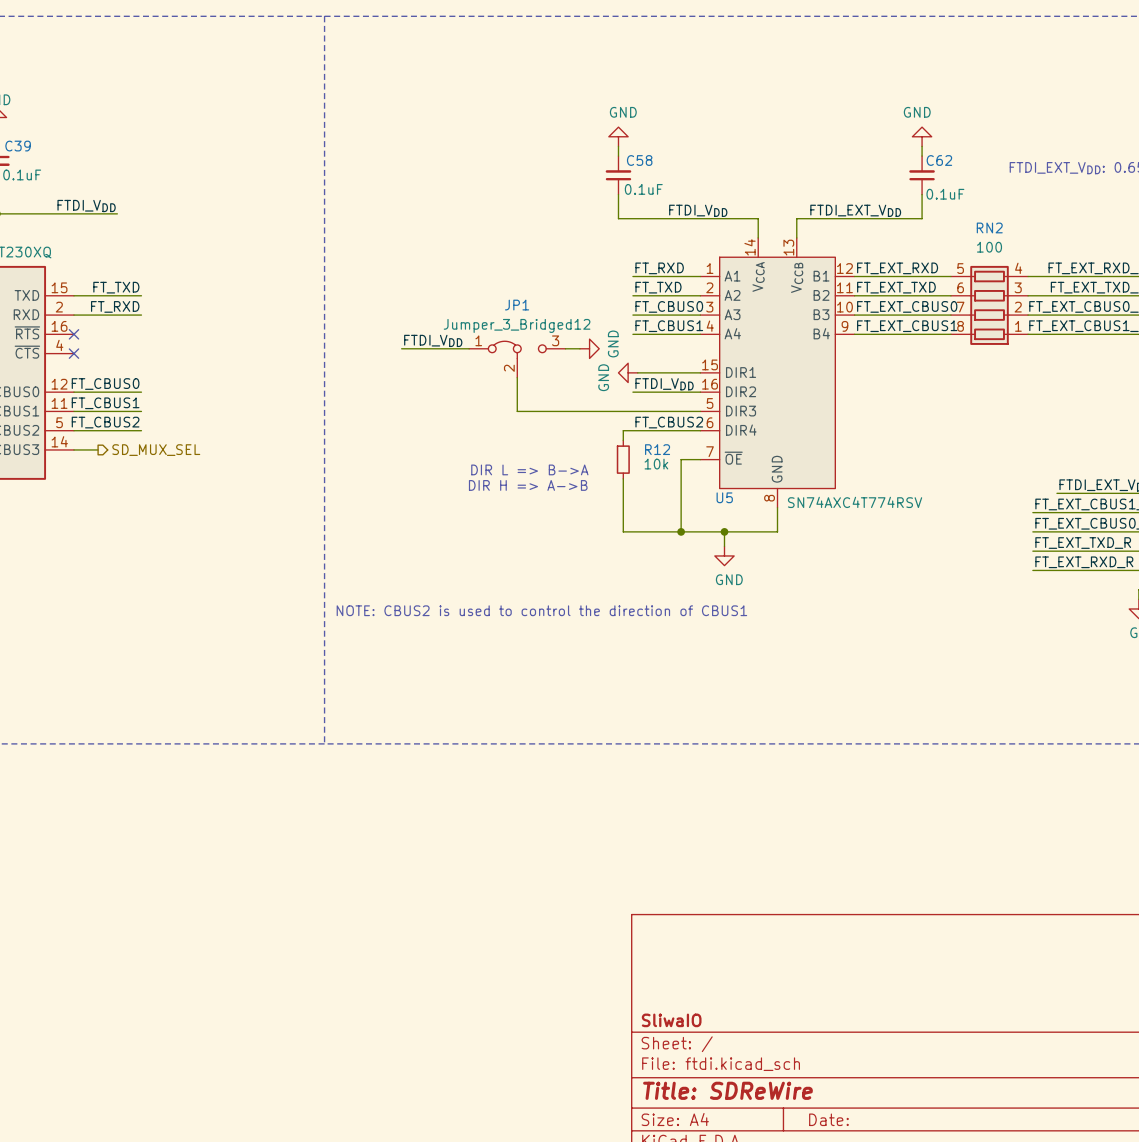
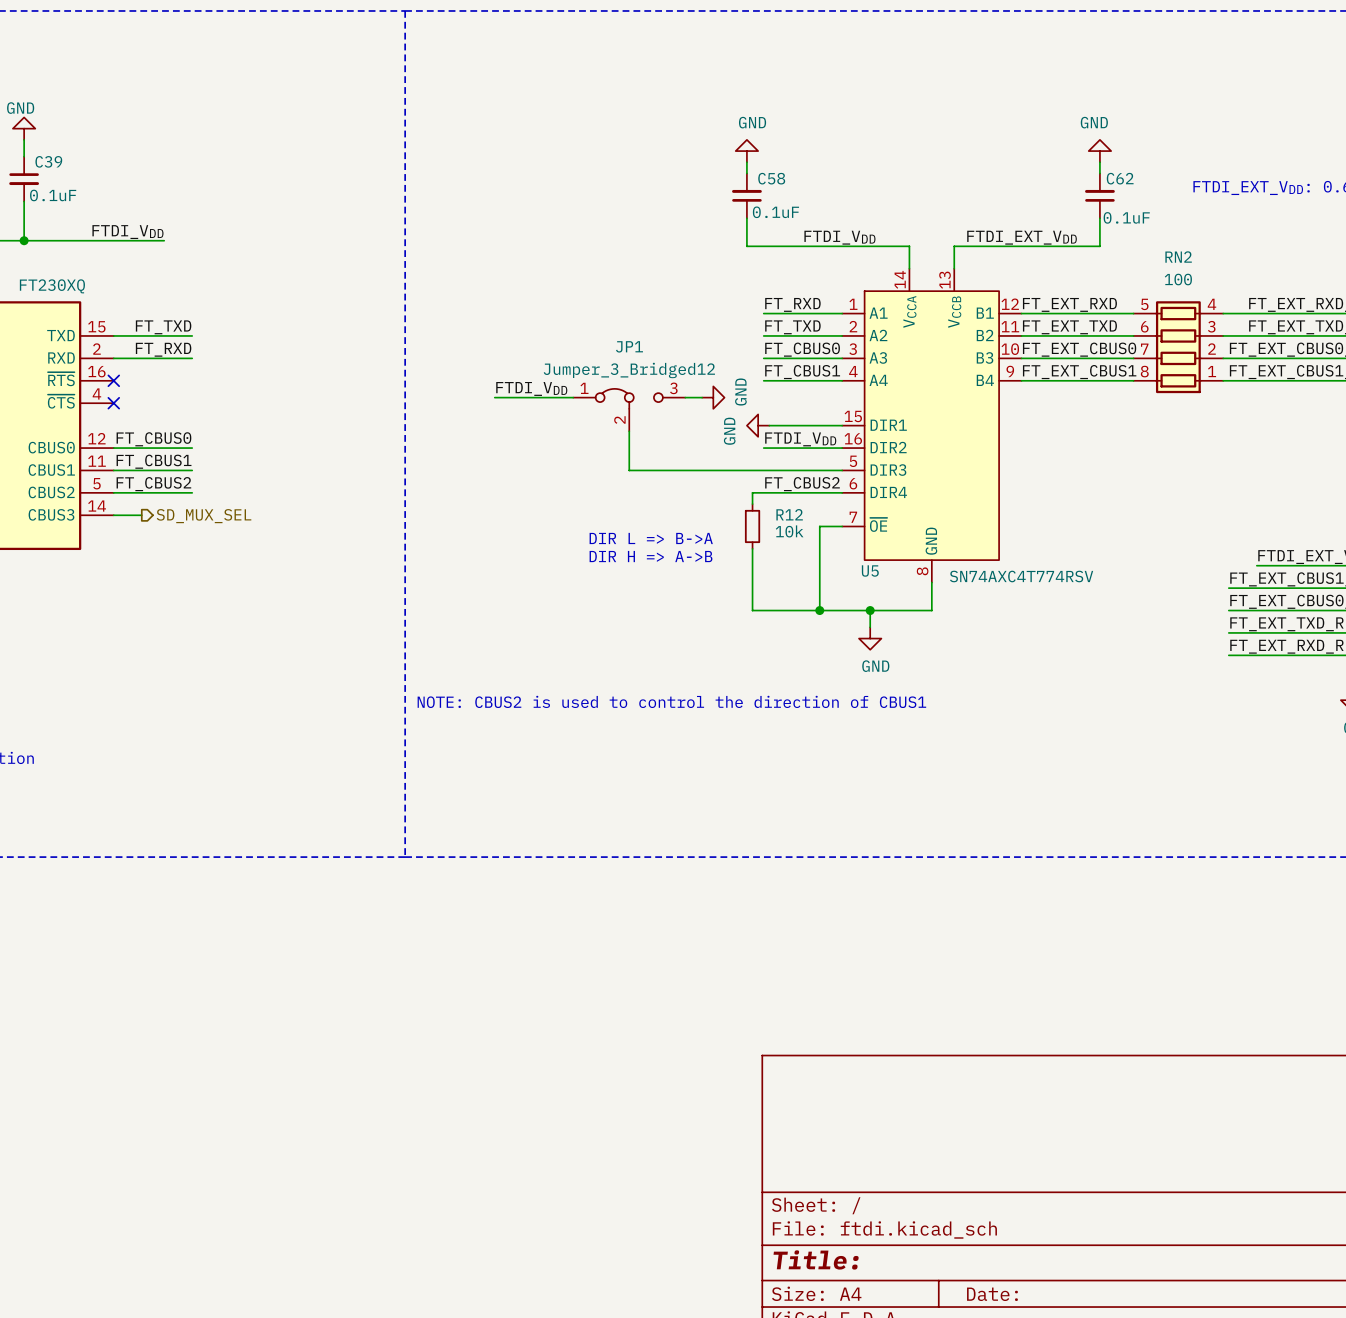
title block: SliwaIO (671, 1020) -> none
title block: Title: SDReWire (727, 1090) -> Title: (816, 1259)

